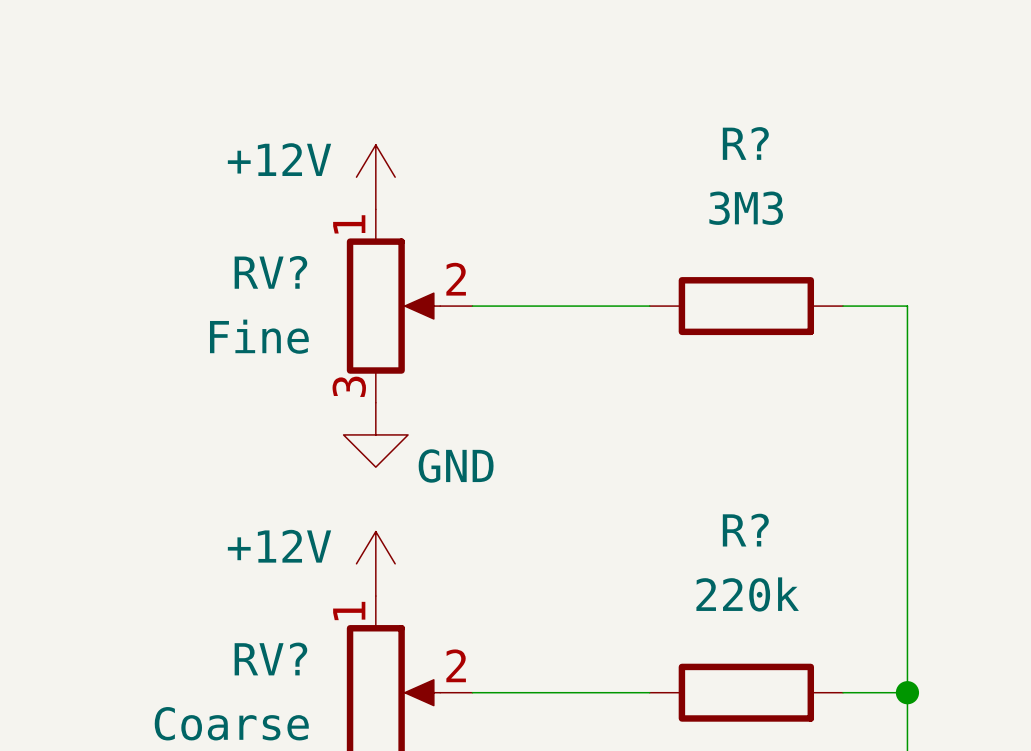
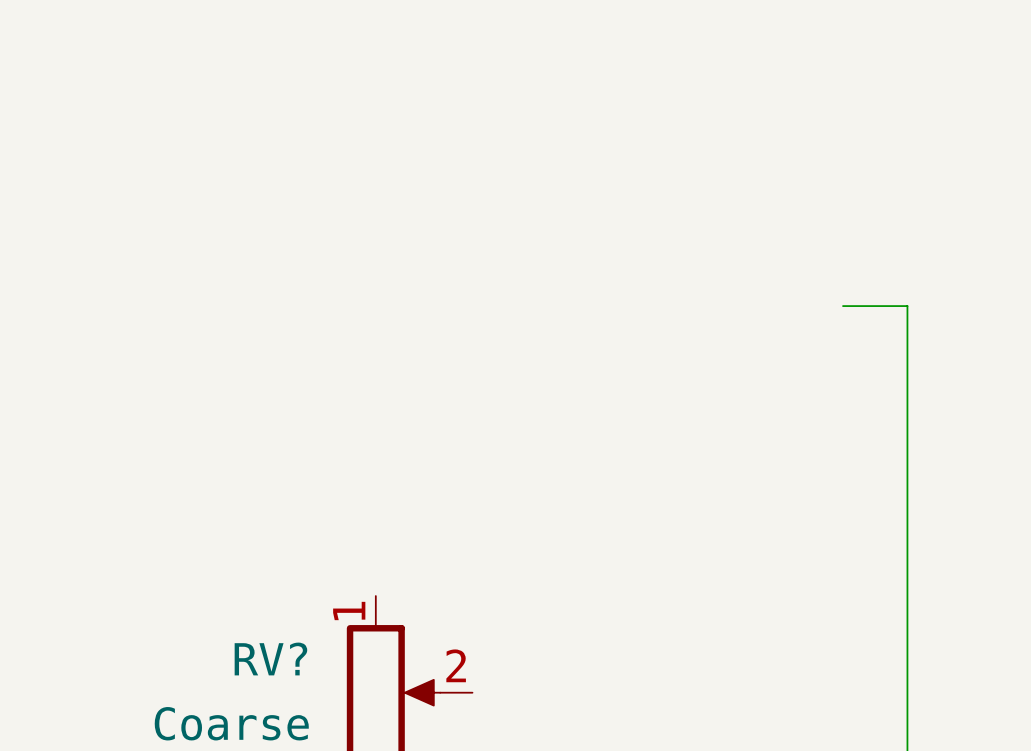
power symbol: +12V (375, 177) -> none
RV?: Fine (409, 306) -> none
wire: (472, 306) (649, 306) -> none
R?: 3M3 (746, 306) -> none
power symbol: GND (375, 434) -> none
power symbol: +12V (375, 563) -> none
wire: (472, 692) (649, 692) -> none
R?: 220k (746, 692) -> none
wire: (843, 692) (907, 692) -> none
junction: (907, 692) -> none

